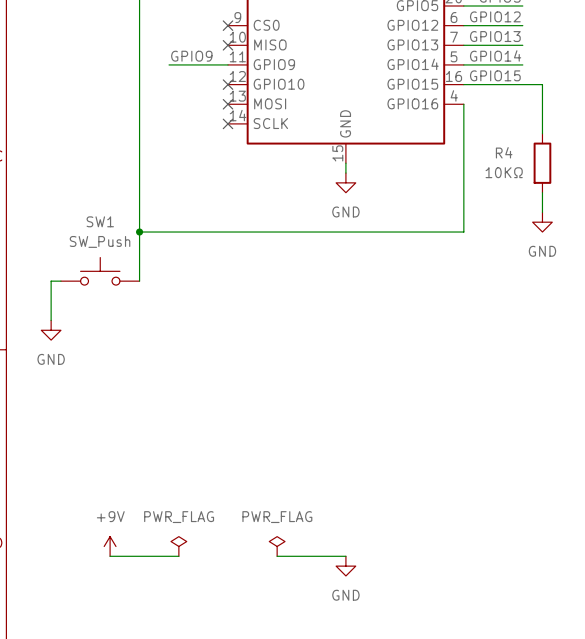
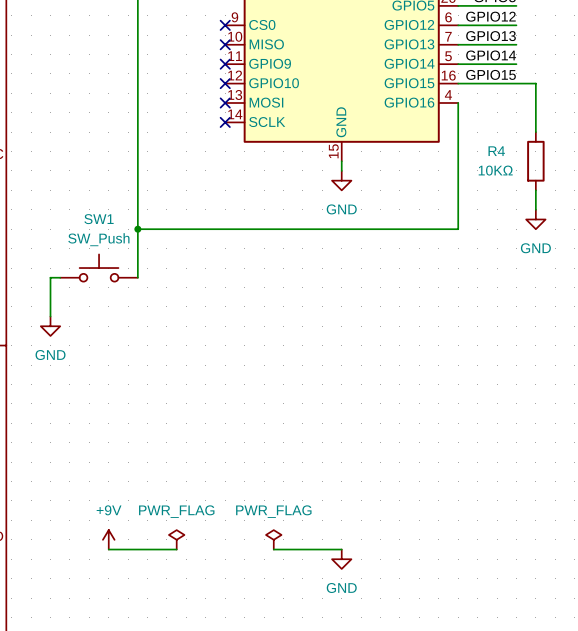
label: GPIO9 (191, 56) -> none
wire: (169, 64) (228, 64) -> none
no-connect mark: none -> (225, 64)

